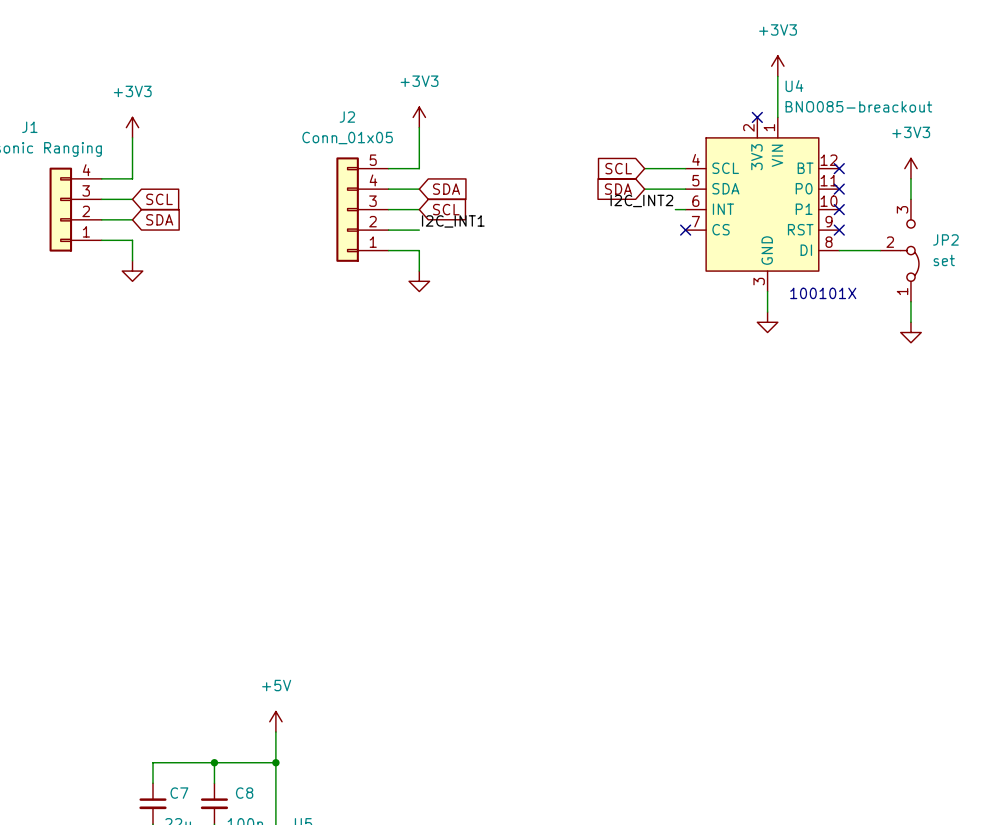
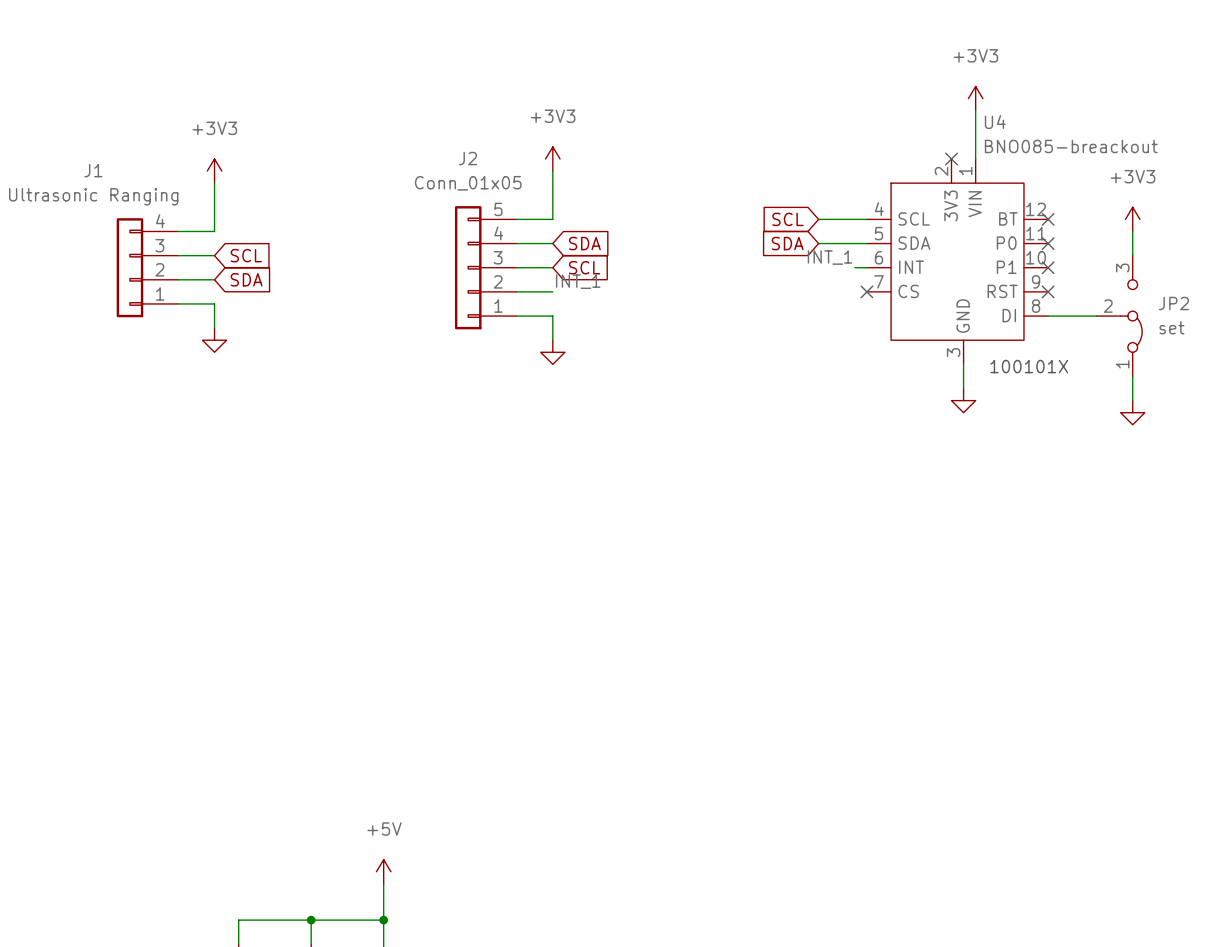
label: I2C_INT2 (641, 200) -> INT_1 (830, 257)
label: I2C_INT1 (453, 221) -> INT_1 (578, 281)

